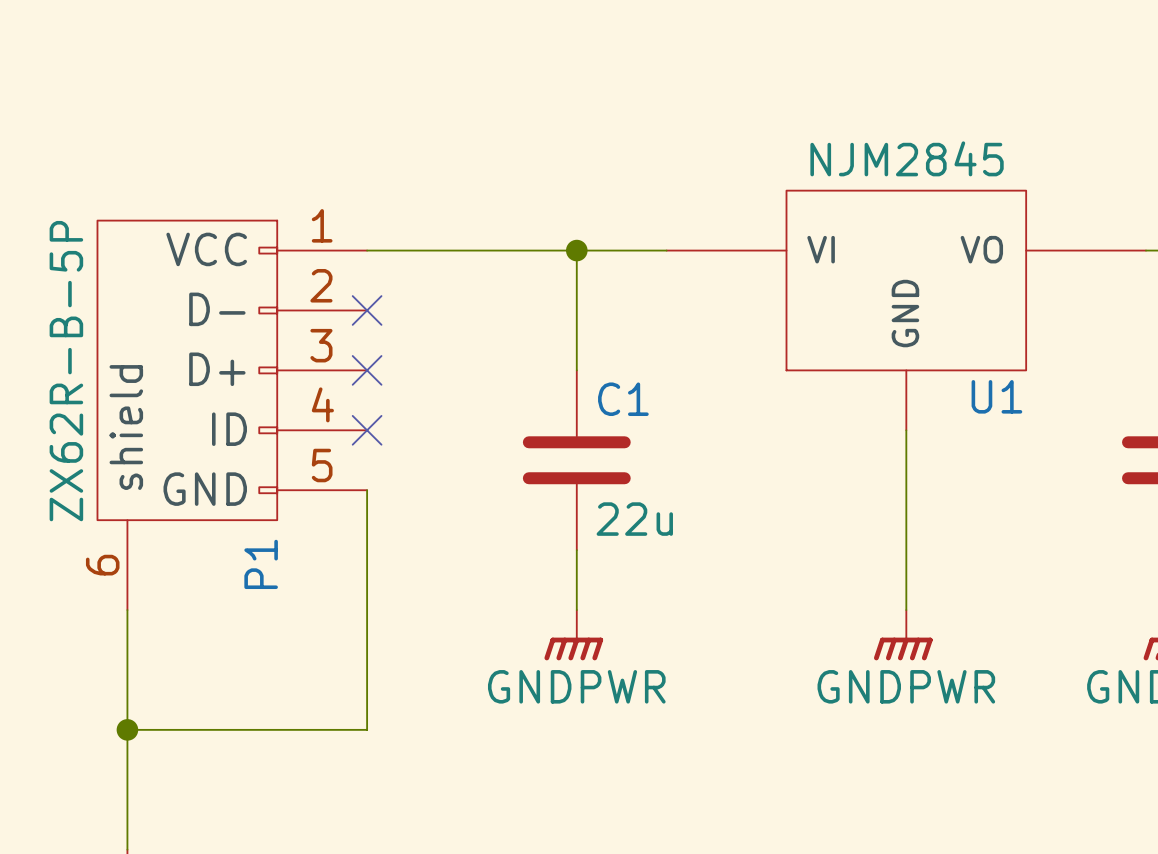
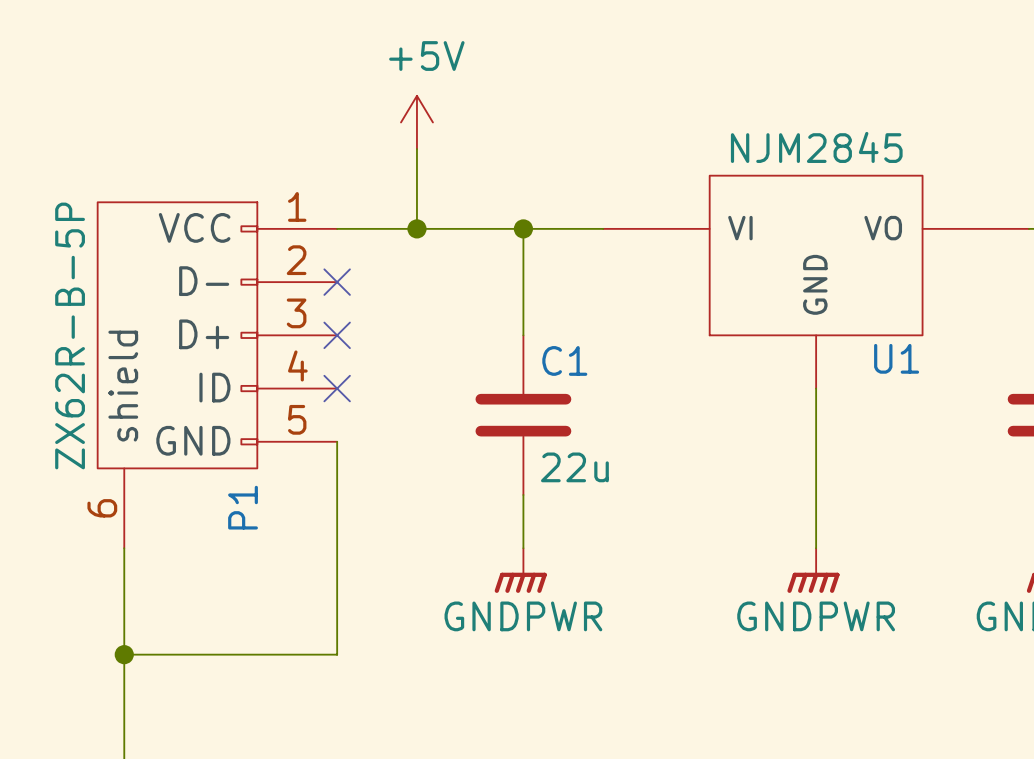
power symbol: none -> +5V (416, 122)
wire: none -> (416, 149) (416, 228)
junction: none -> (416, 228)

